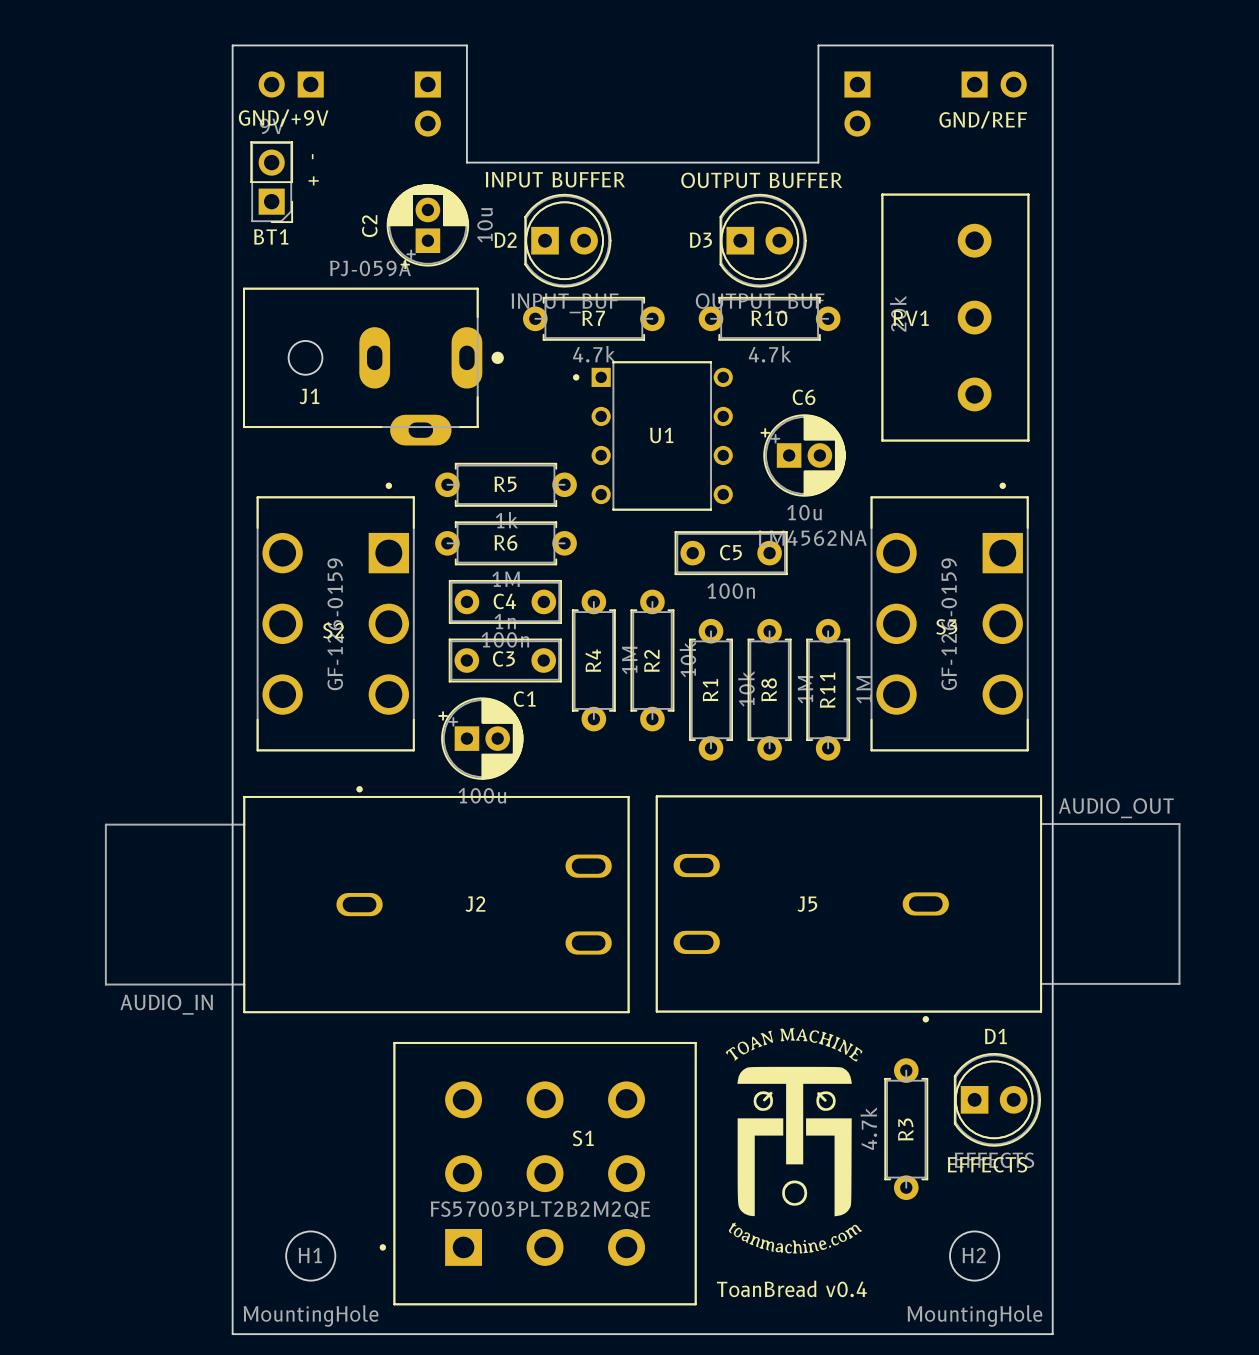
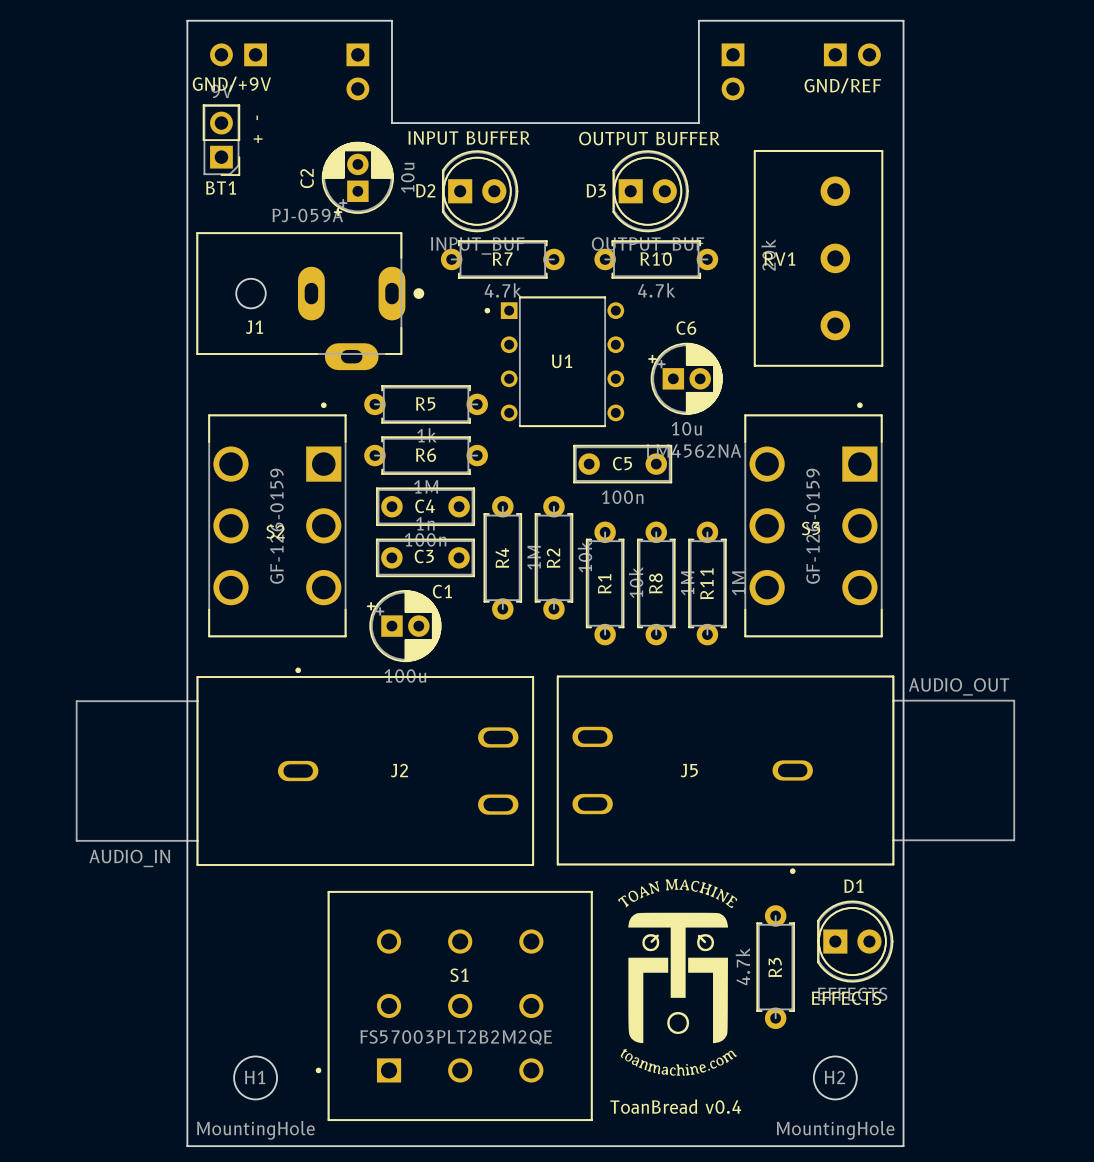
S1 footprint: [379, 1041, 697, 1306] -> [315, 891, 593, 1121]
S1 name position: S1 (583, 1138) -> S1 (459, 975)

